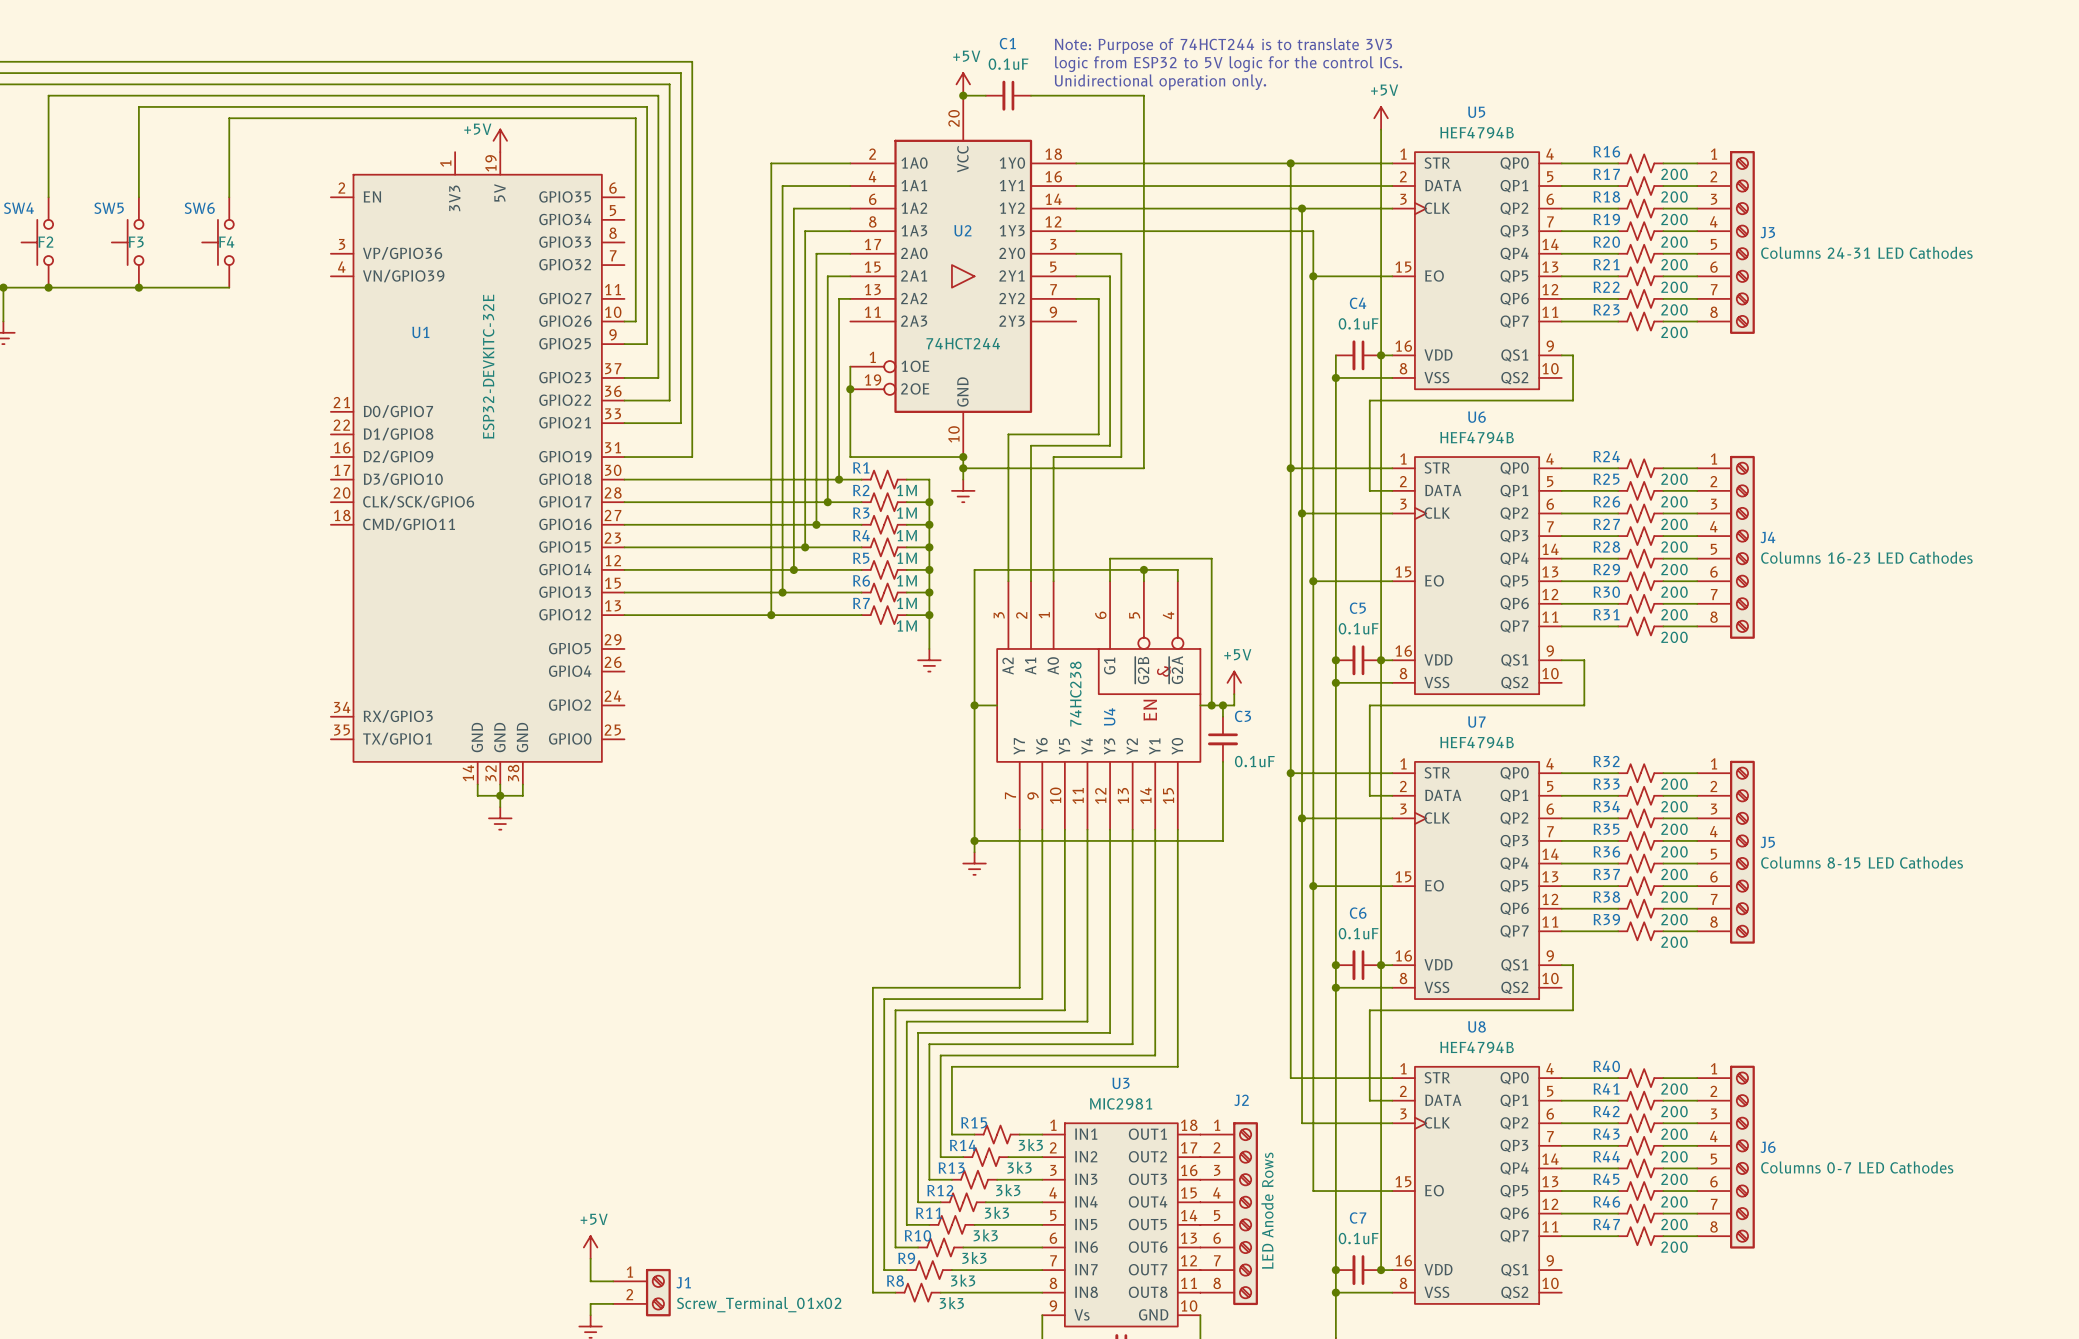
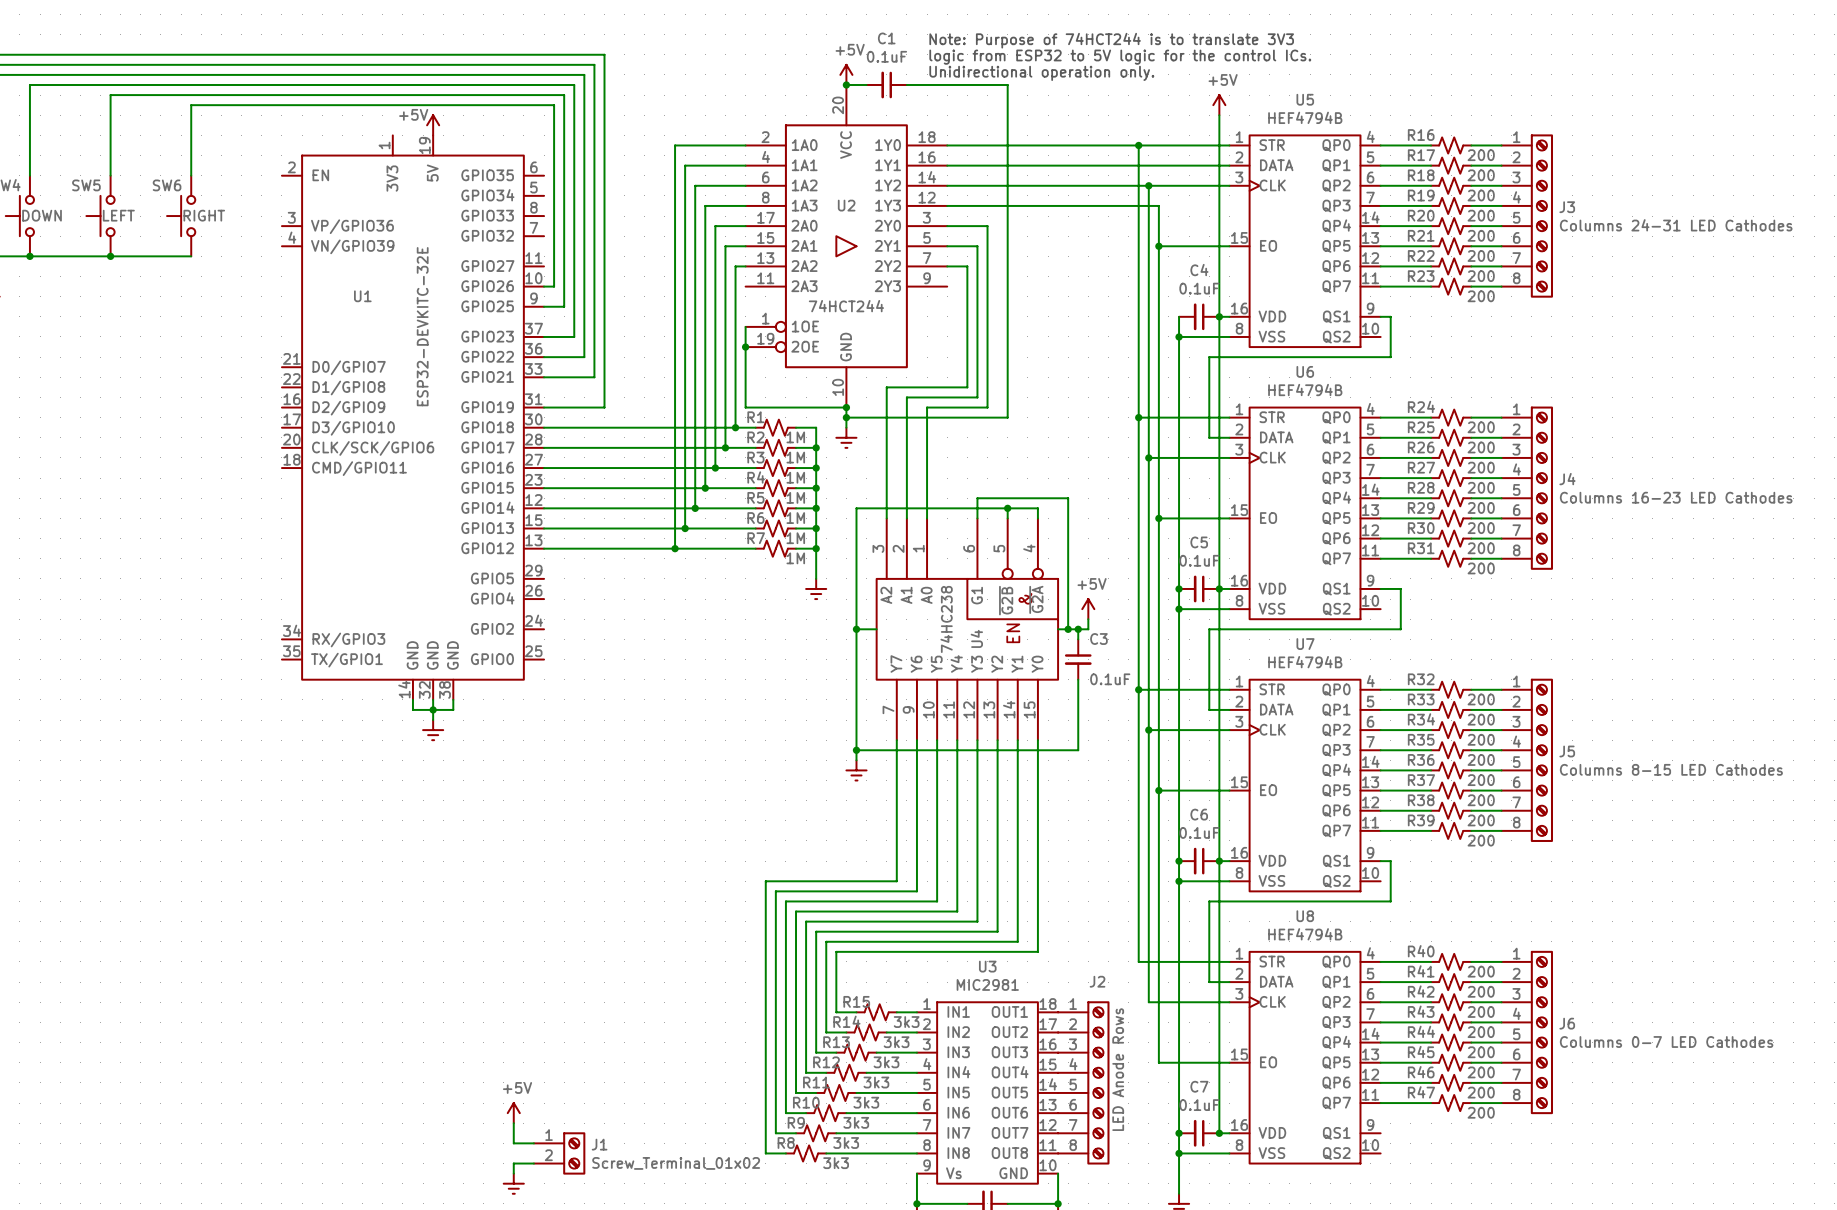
SW4 value: F2 (45, 242) -> DOWN (42, 215)
SW5 value: F3 (136, 242) -> LEFT (118, 215)
SW6 value: F4 (226, 242) -> RIGHT (204, 215)

